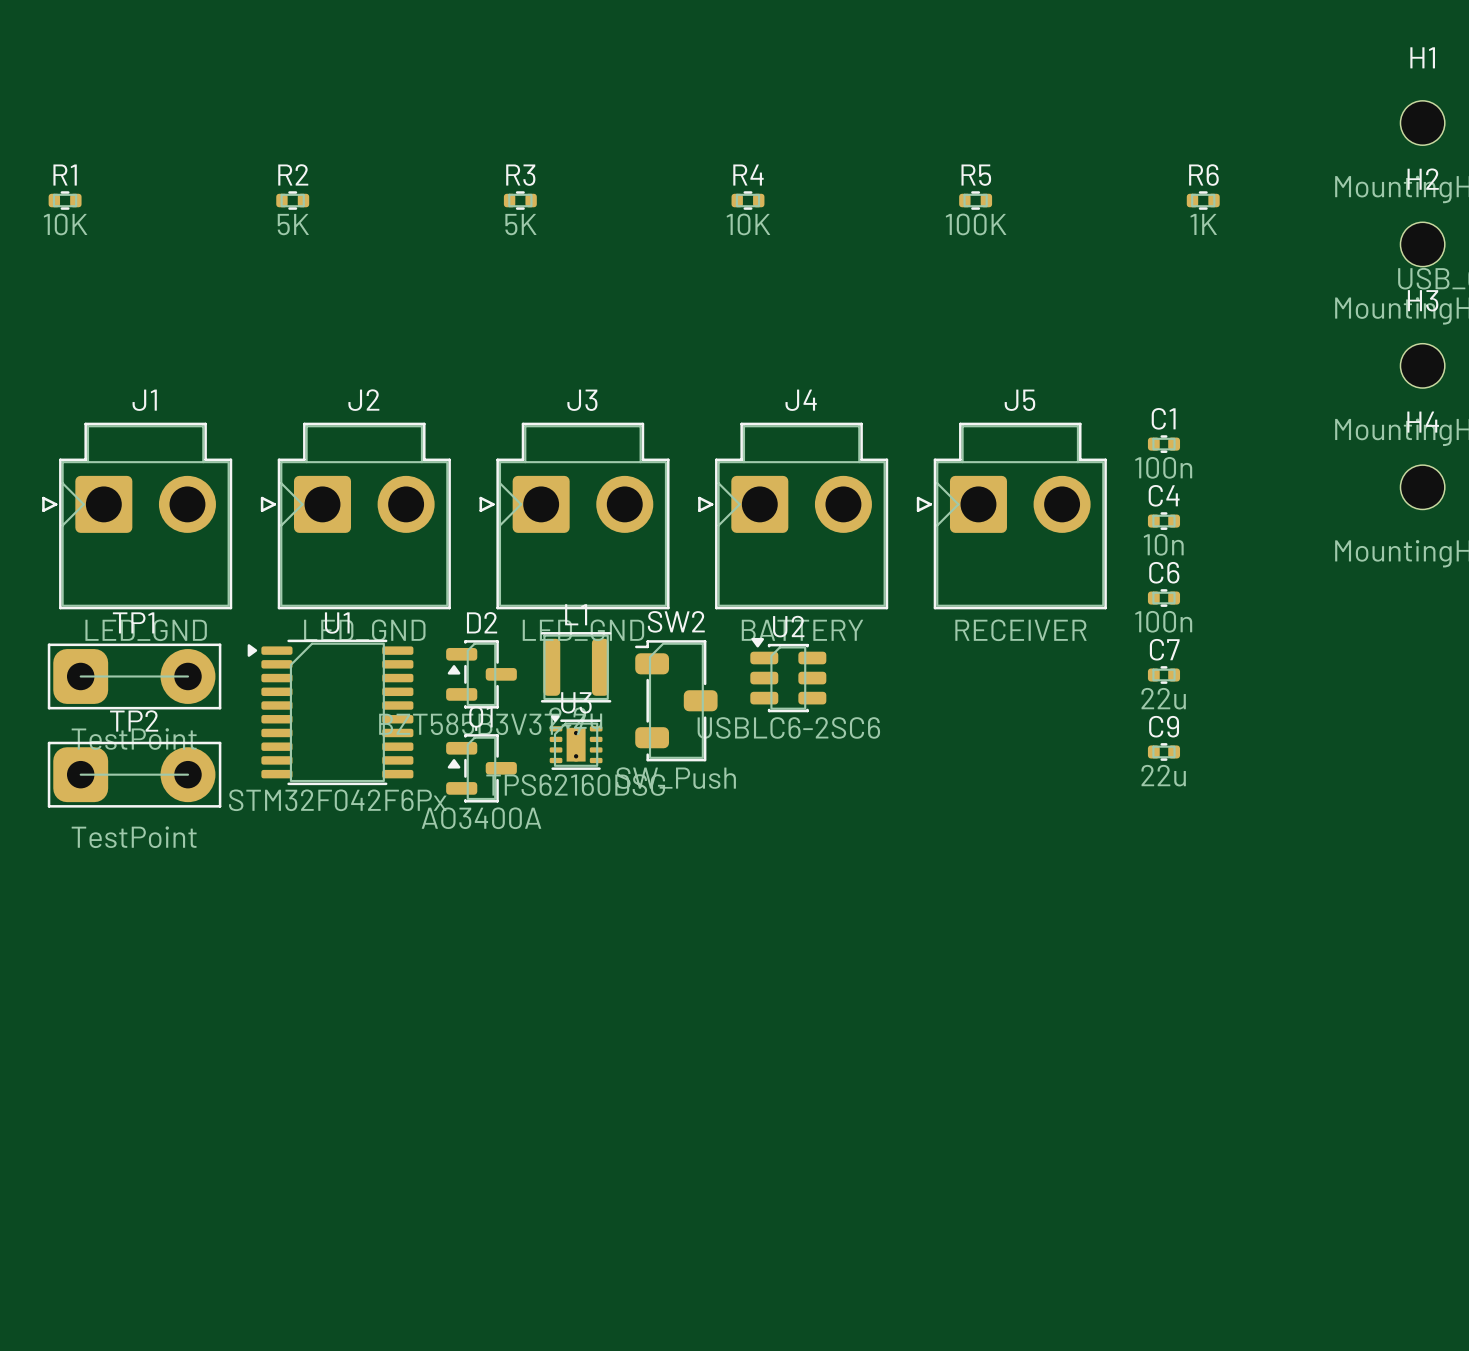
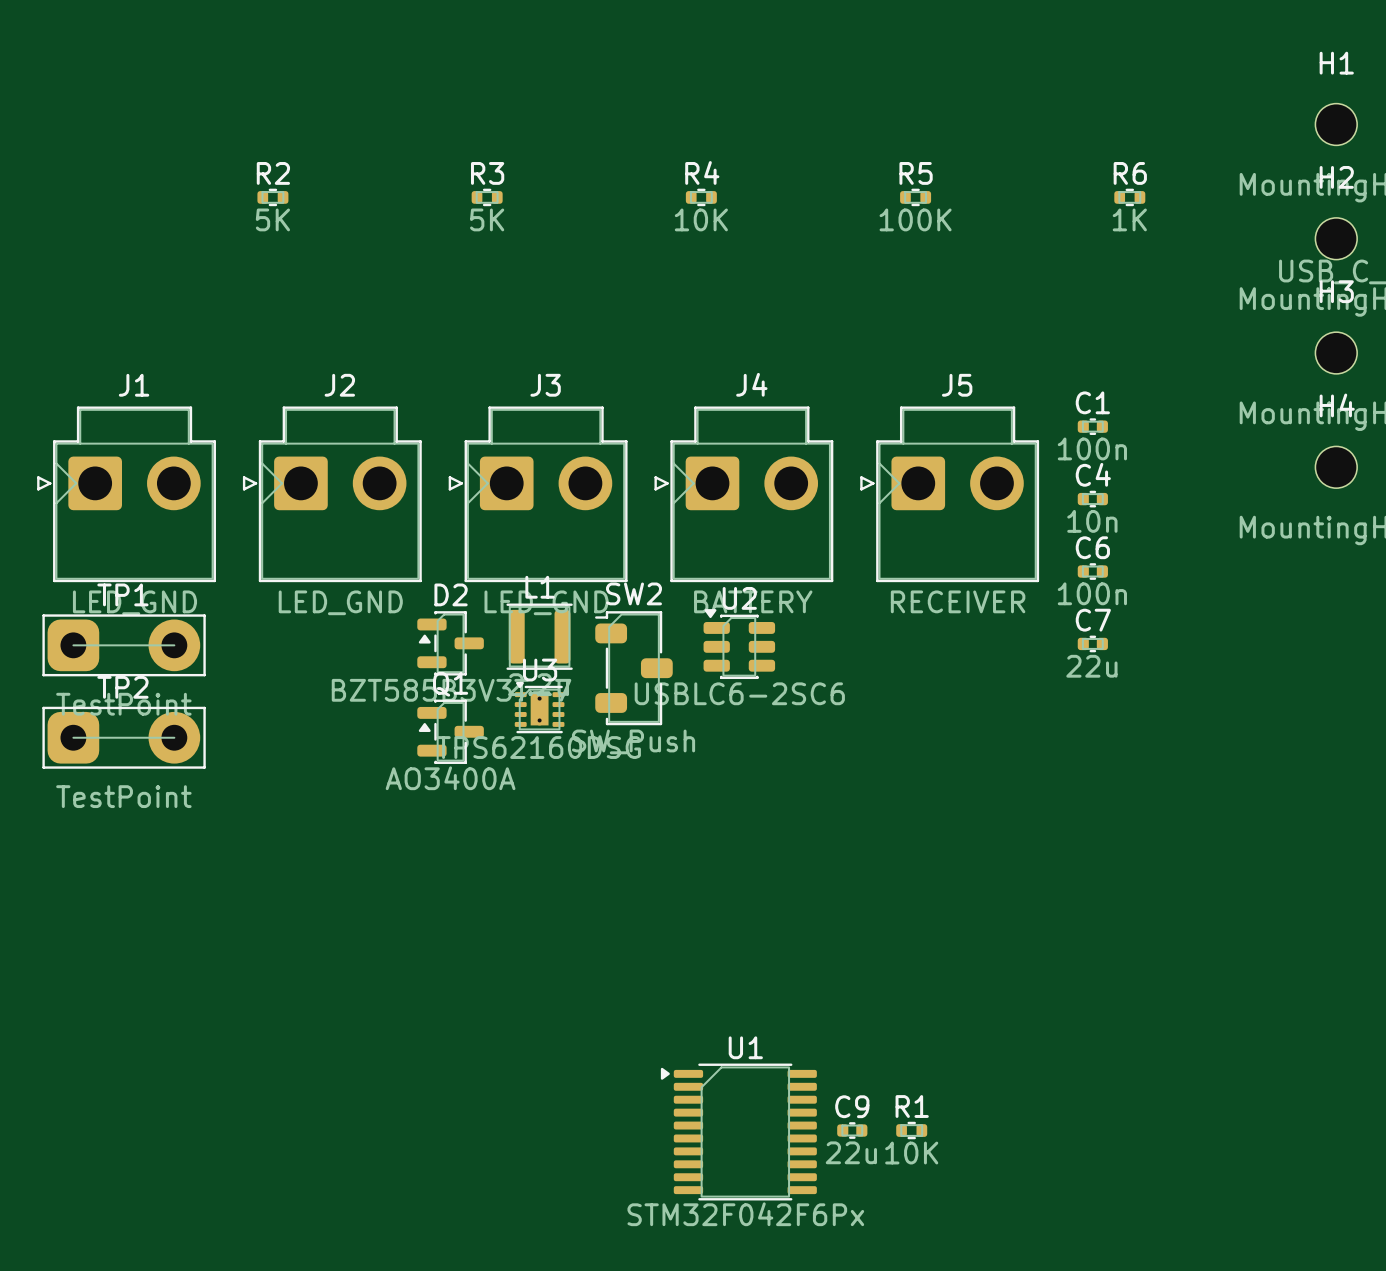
R1 position: (65, 200) -> (911, 1130)
U1 position: (330, 712) -> (738, 1132)
C9 position: (1163, 751) -> (852, 1130)

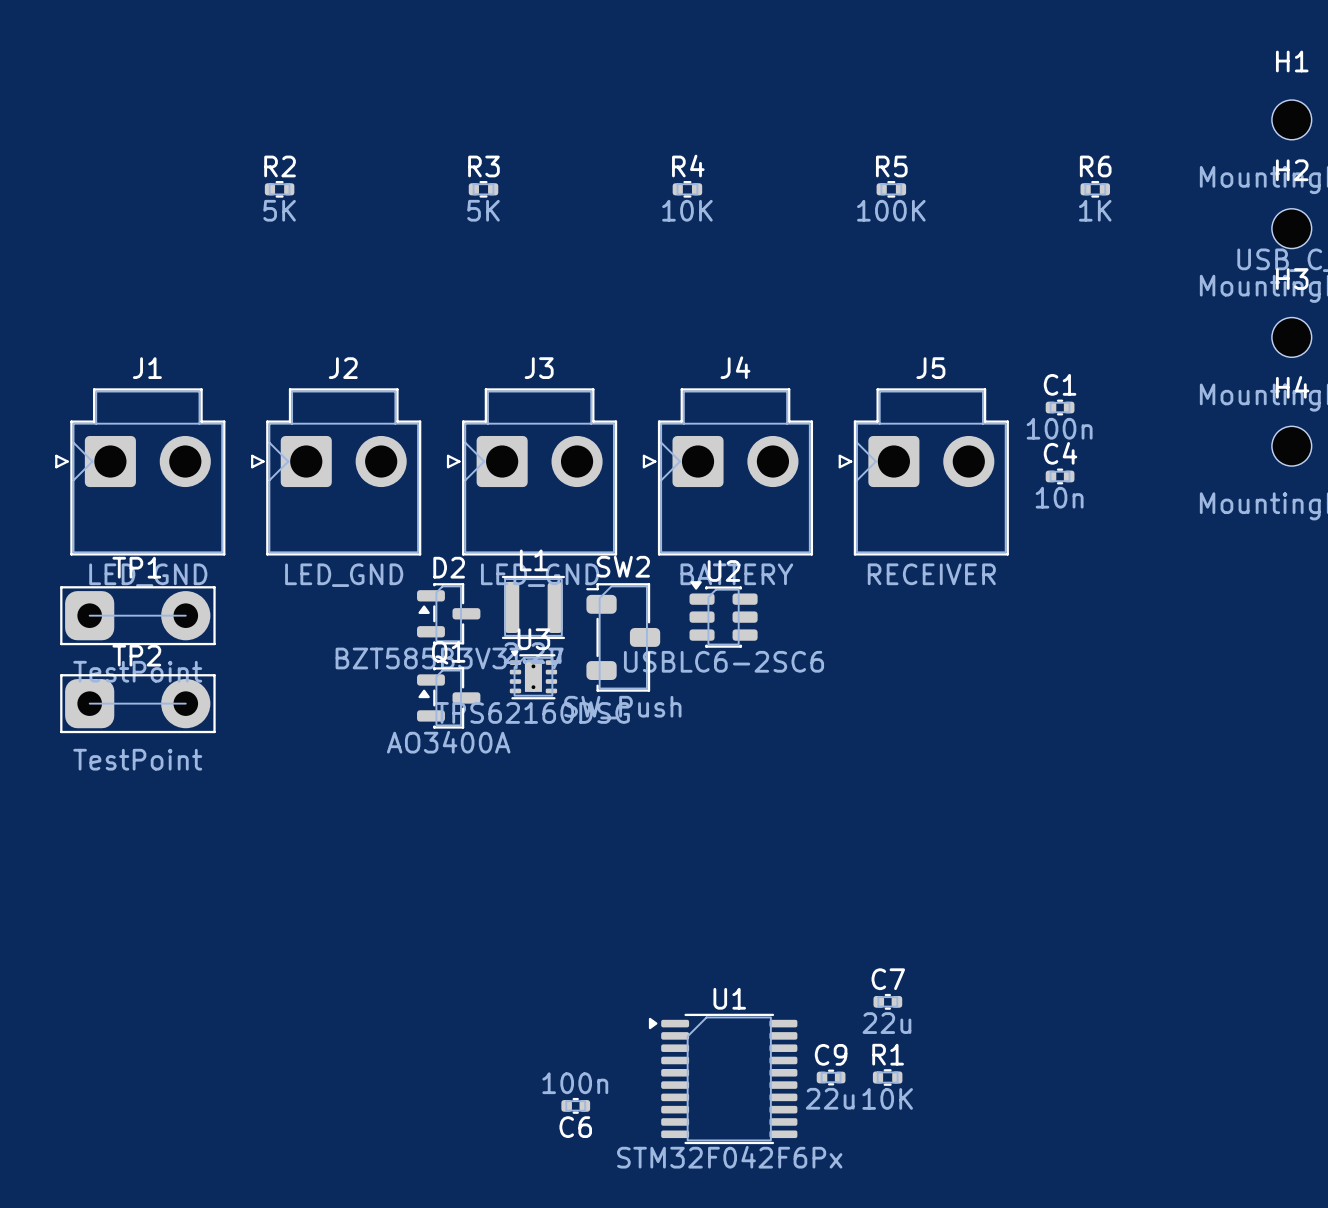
C6 name position: C6 (1092, 547) -> C6 (575, 1127)
C6 position: (1092, 571) -> (575, 1105)
C6 value position: 100n (1092, 593) -> 100n (575, 1083)
C7 position: (1092, 643) -> (887, 1001)

